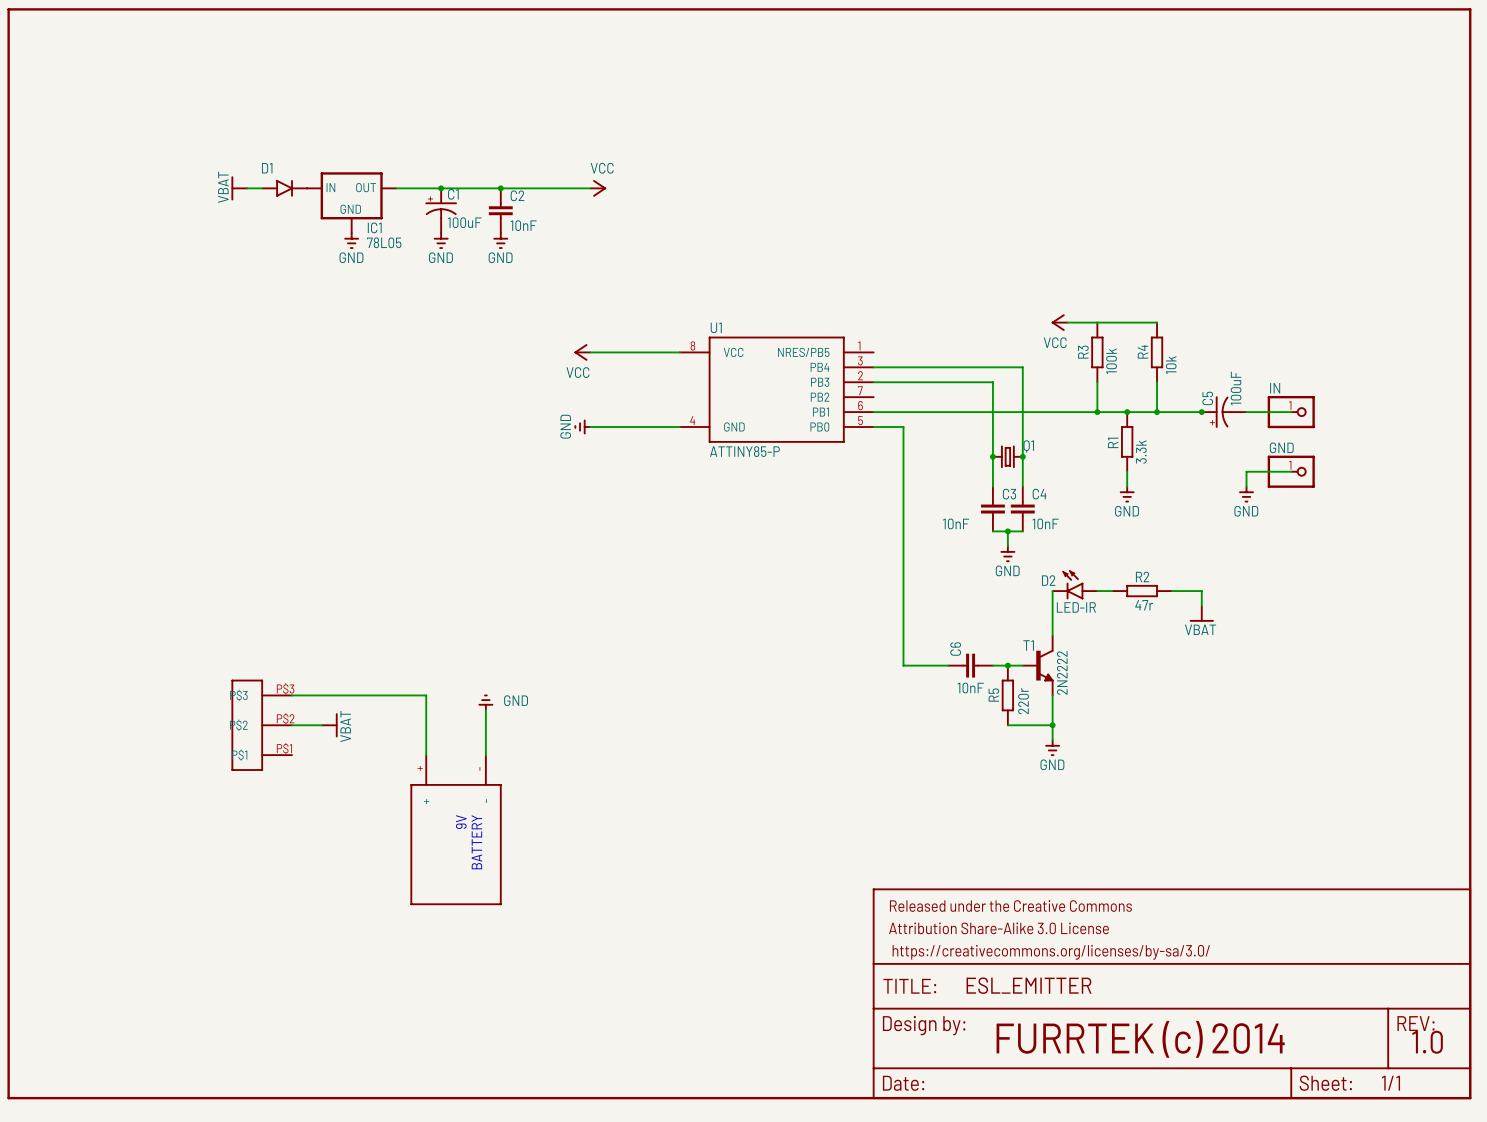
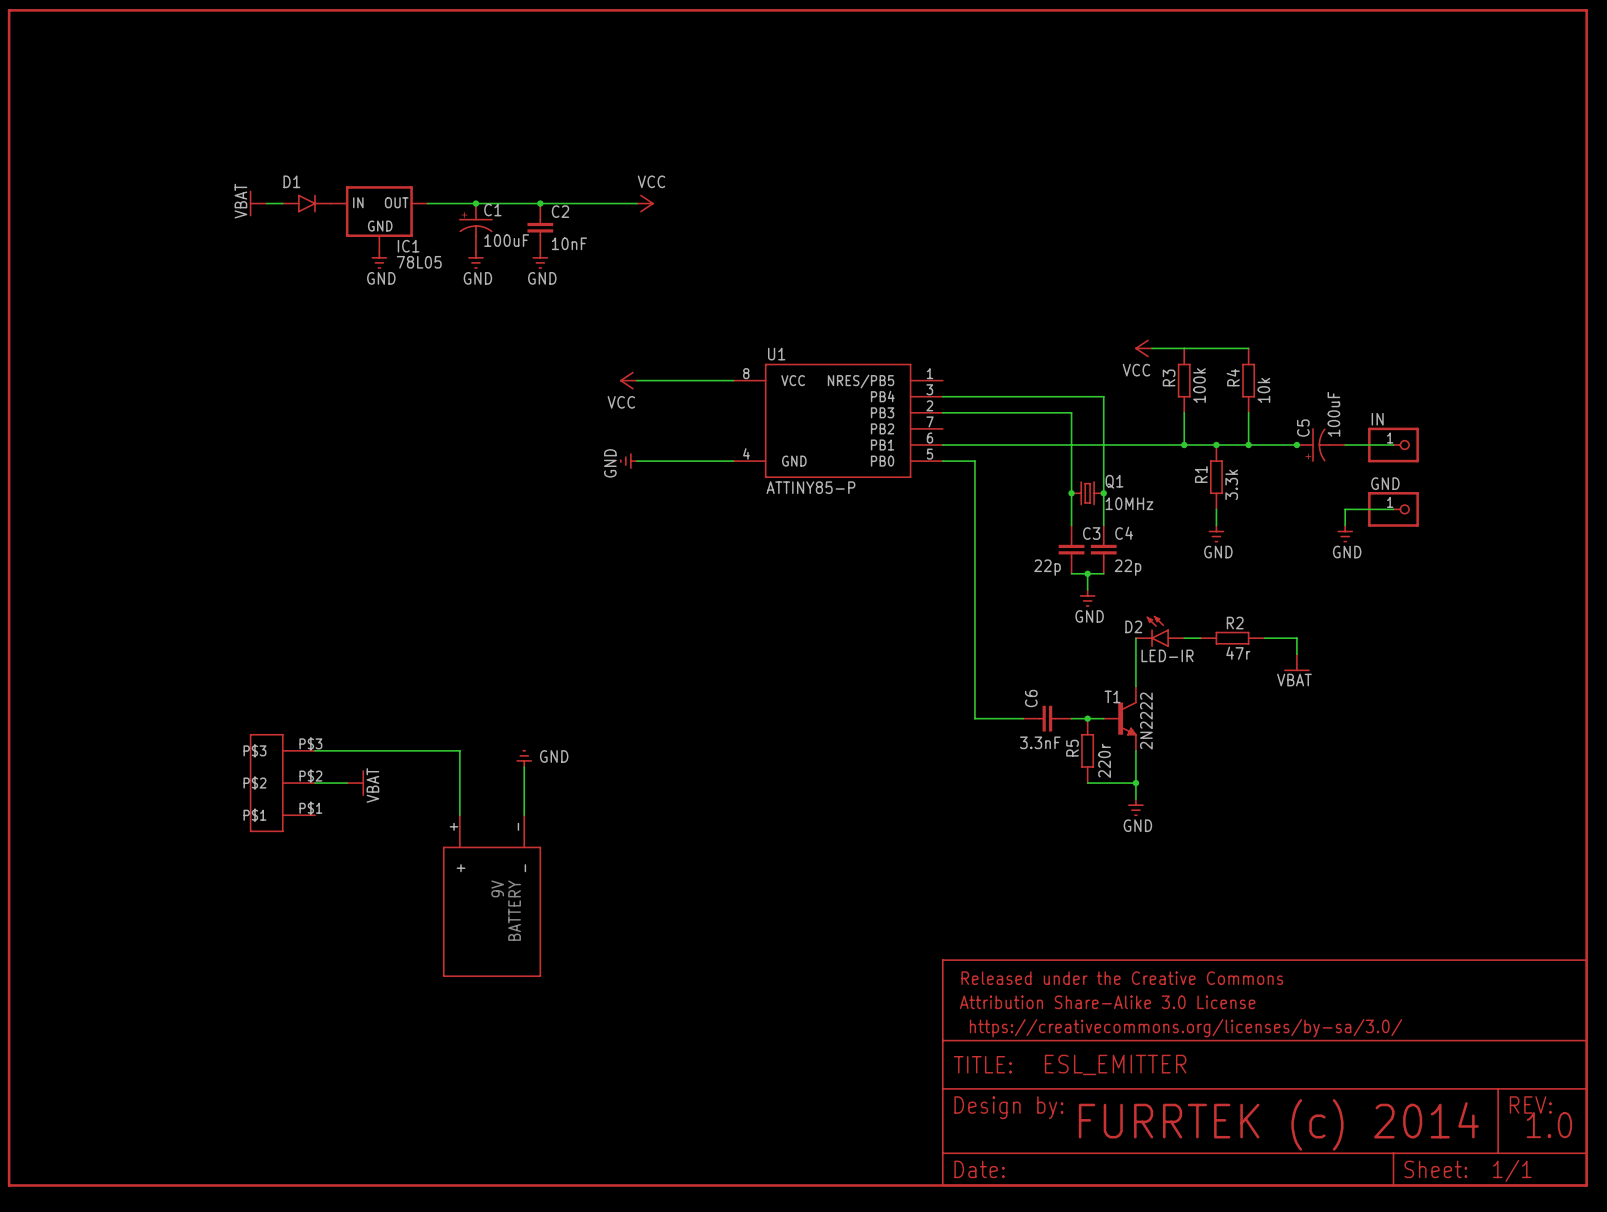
Q1 value: none -> 10MHz (1129, 503)
C3 value: 10nF (956, 523) -> 22p (1047, 567)
C4 value: 10nF (1045, 523) -> 22p (1127, 567)
C6 value: 10nF (970, 688) -> 3.3nF (1040, 742)

